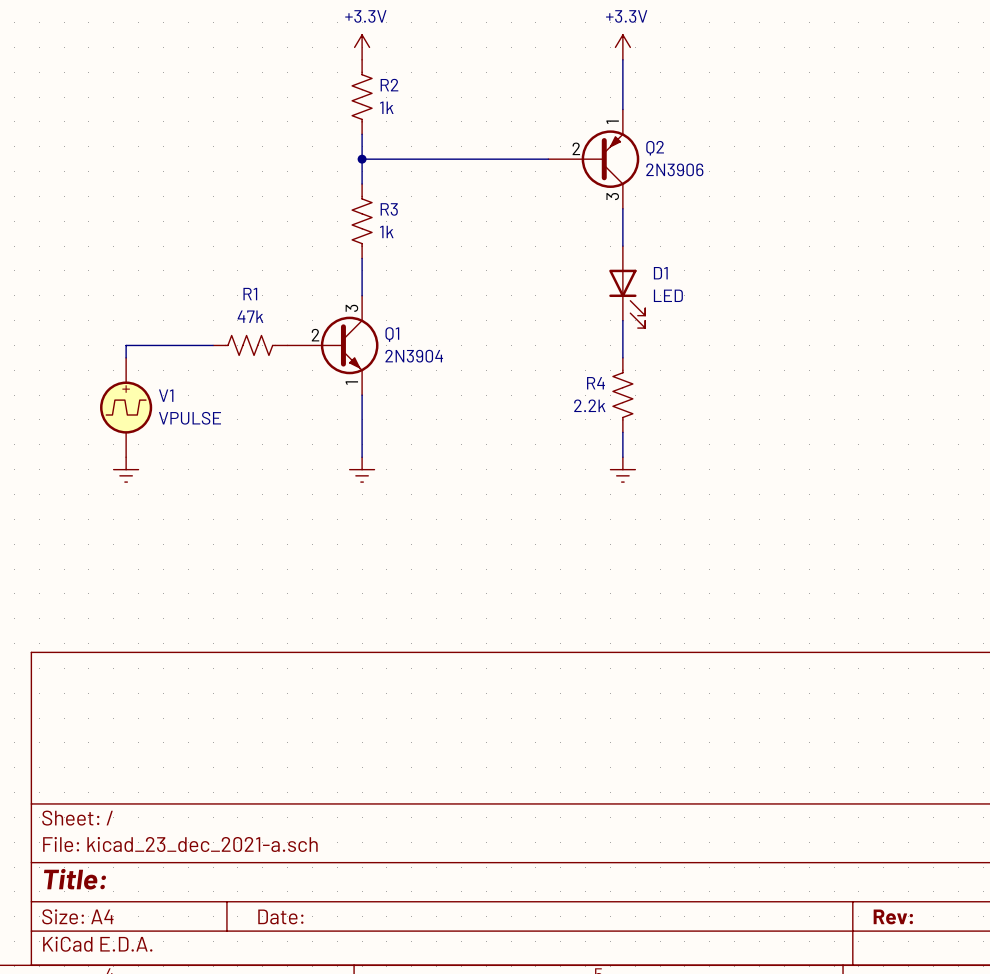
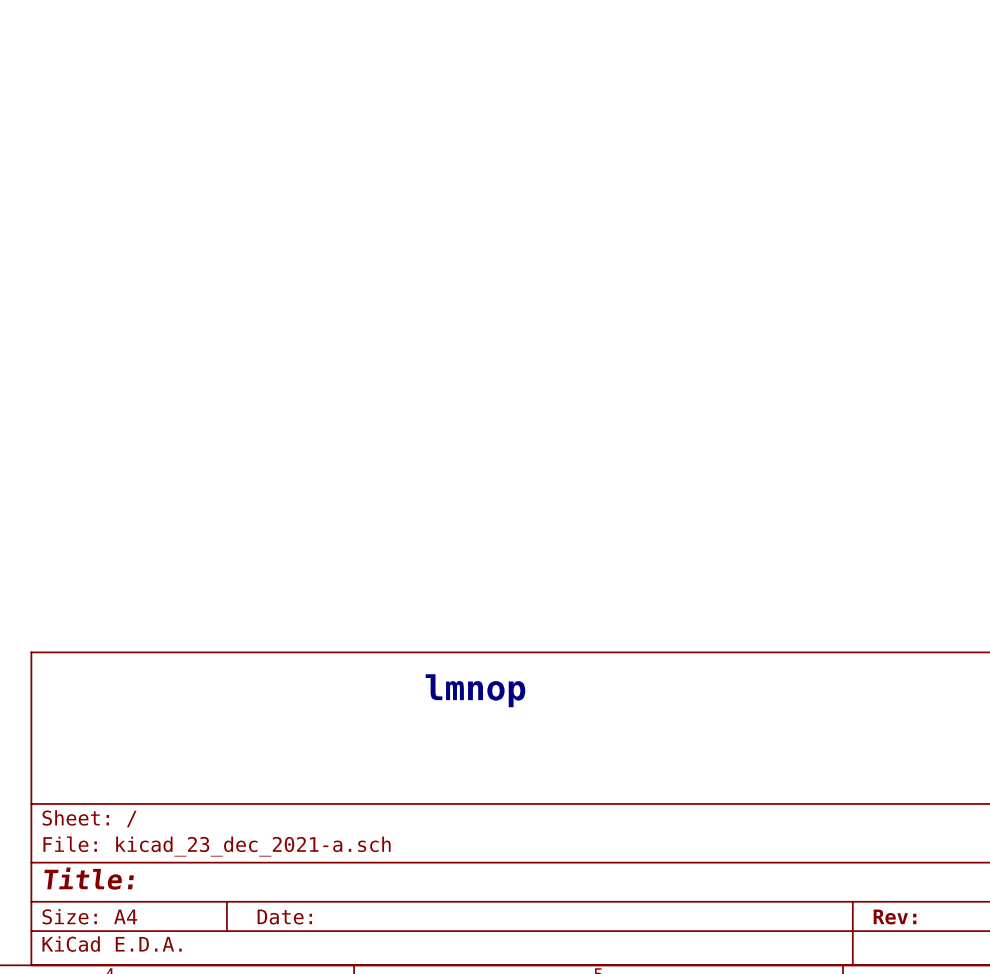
power symbol: +3.3V (362, 47) -> none
power symbol: +3.3V (622, 47) -> none
wire: (622, 59) (622, 109) -> none
R2: 1k (362, 97) -> none
wire: (362, 134) (362, 184) -> none
wire: (362, 159) (548, 159) -> none
junction: (362, 159) -> none
Q2: 2N3906 (593, 159) -> none
wire: (622, 208) (622, 246) -> none
R3: 1k (362, 221) -> none
wire: (362, 258) (362, 295) -> none
D1: LED (627, 287) -> none
wire: (622, 320) (622, 357) -> none
wire: (213, 345) (126, 345) (126, 357) -> none
R1: 47k (250, 345) -> none
Q1: 2N3904 (333, 345) -> none
wire: (362, 395) (362, 457) -> none
R4: 2.2k (622, 395) -> none
V1: VPULSE (126, 407) -> none
wire: (622, 432) (622, 457) -> none
power symbol: (126, 469) -> none
power symbol: (362, 469) -> none
power symbol: (622, 469) -> none
text: none -> lmnop (475, 690)

